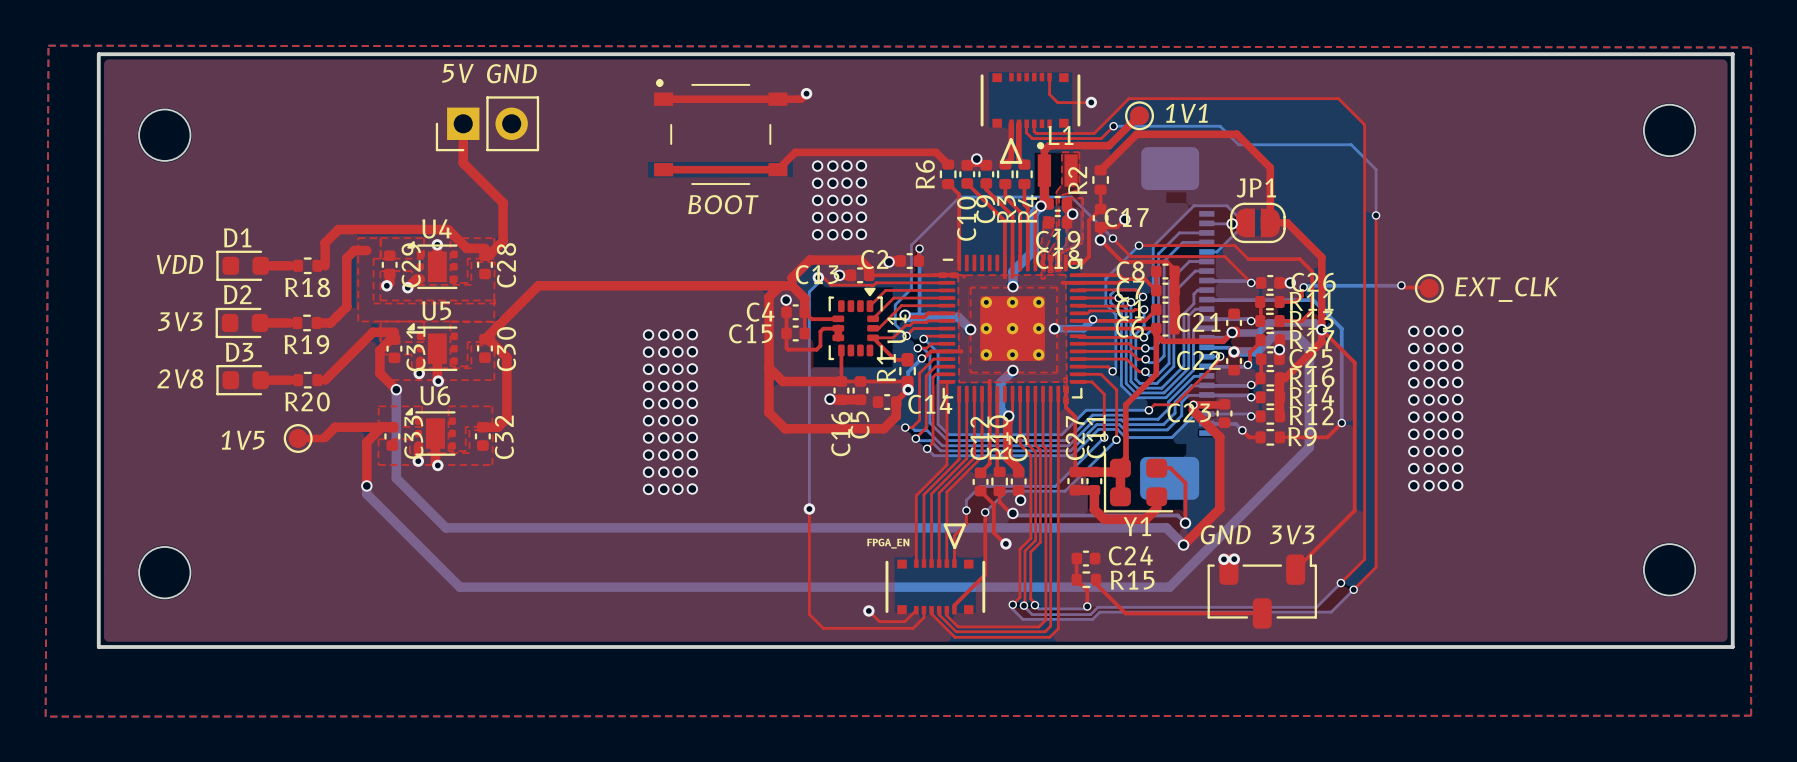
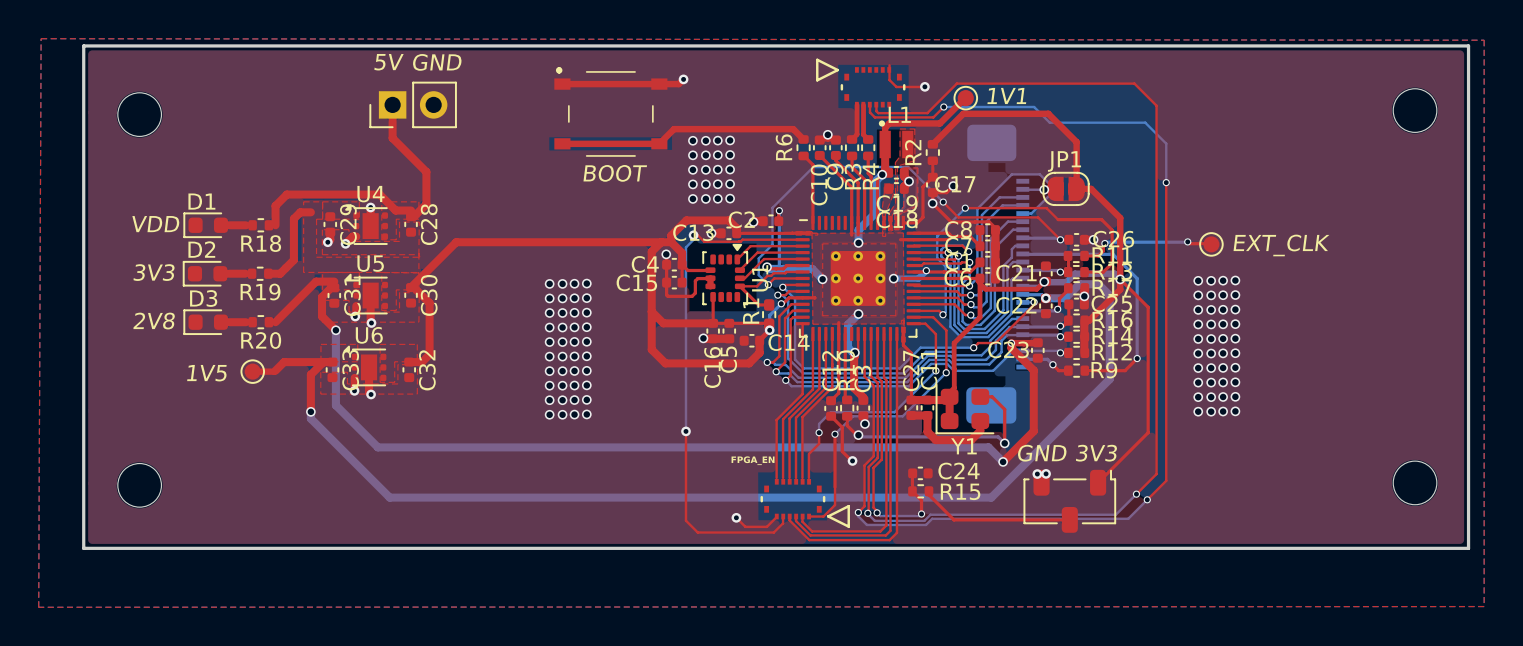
part: none -> (860, 83)
part: (1030, 118) -> none
part: (935, 568) -> none
top track: (985, 574) (954, 605) (954, 608) -> (835, 486) (835, 505) (823, 516) (809, 516)
part: none -> (805, 503)

